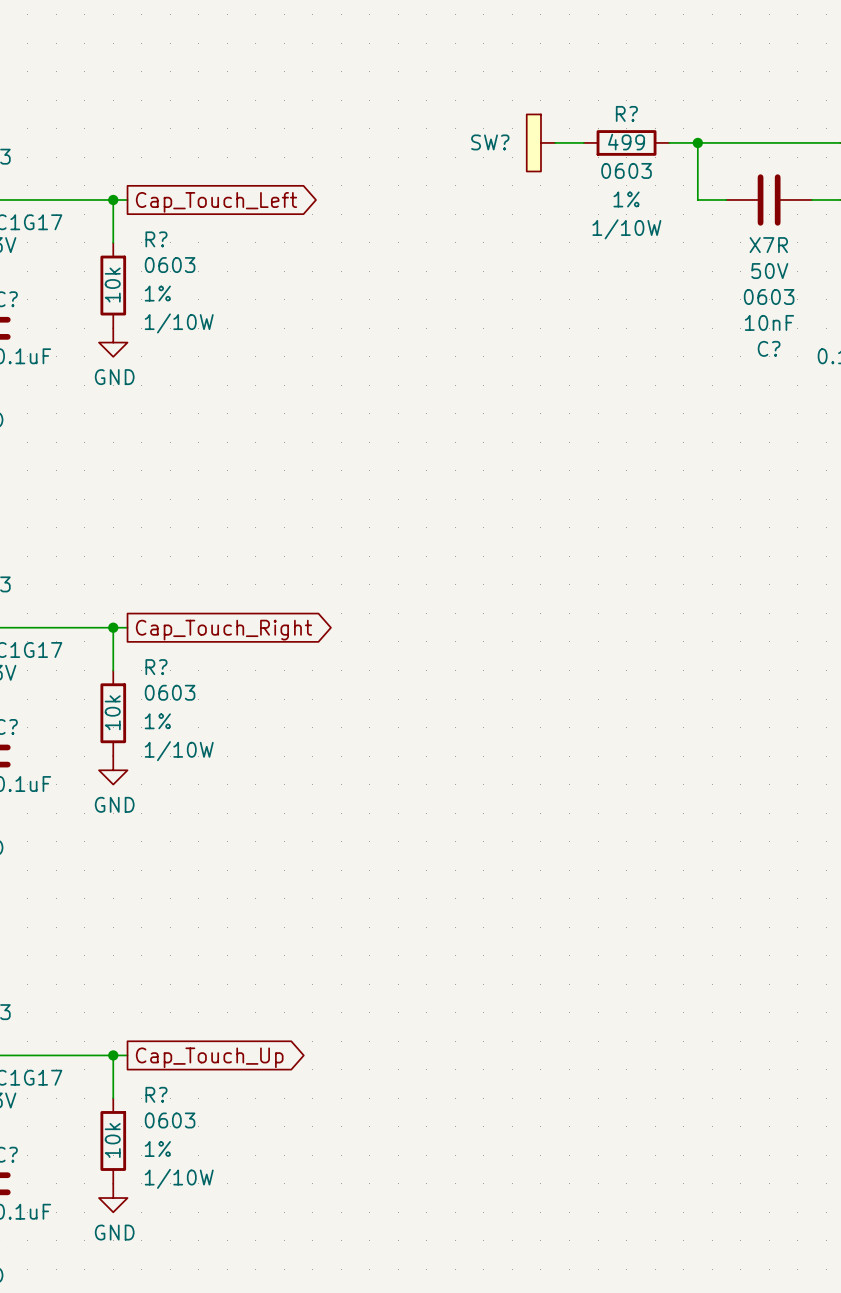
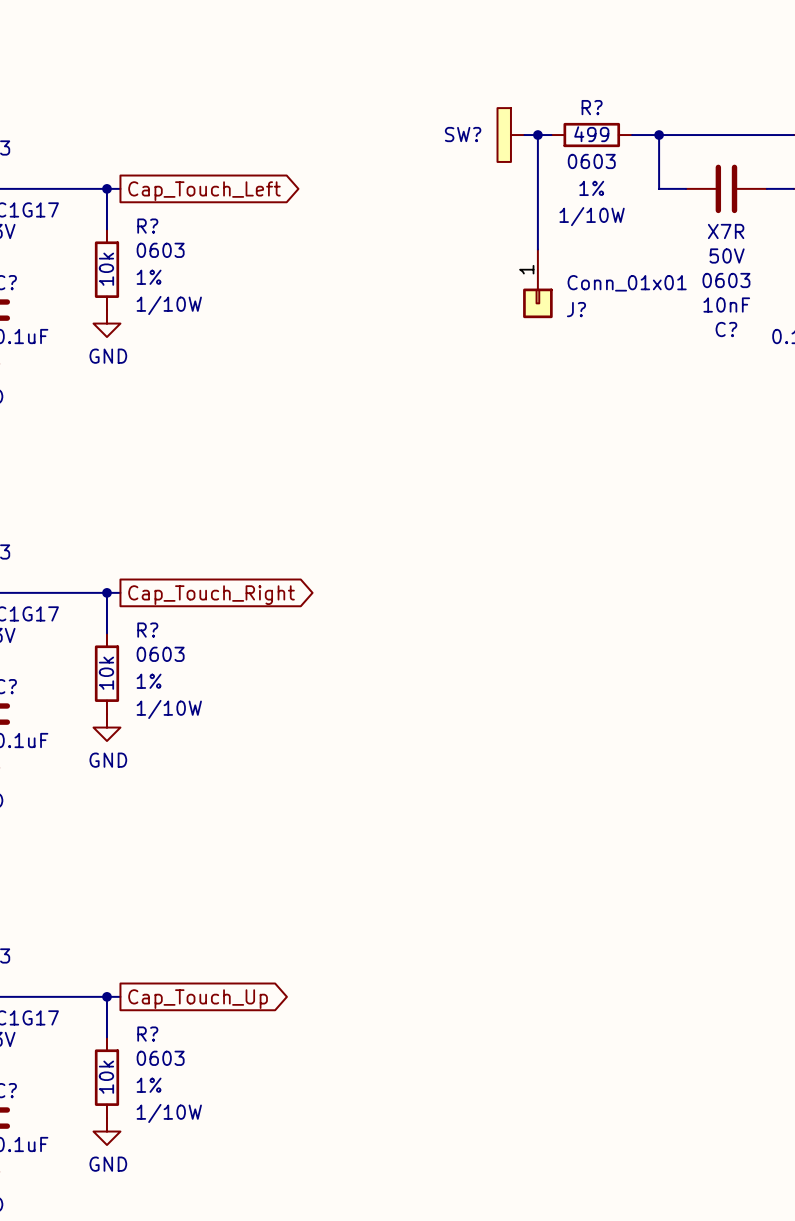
wire: none -> (537, 135) (537, 249)
junction: none -> (537, 135)
J?: none -> Conn_01x01 (537, 283)

